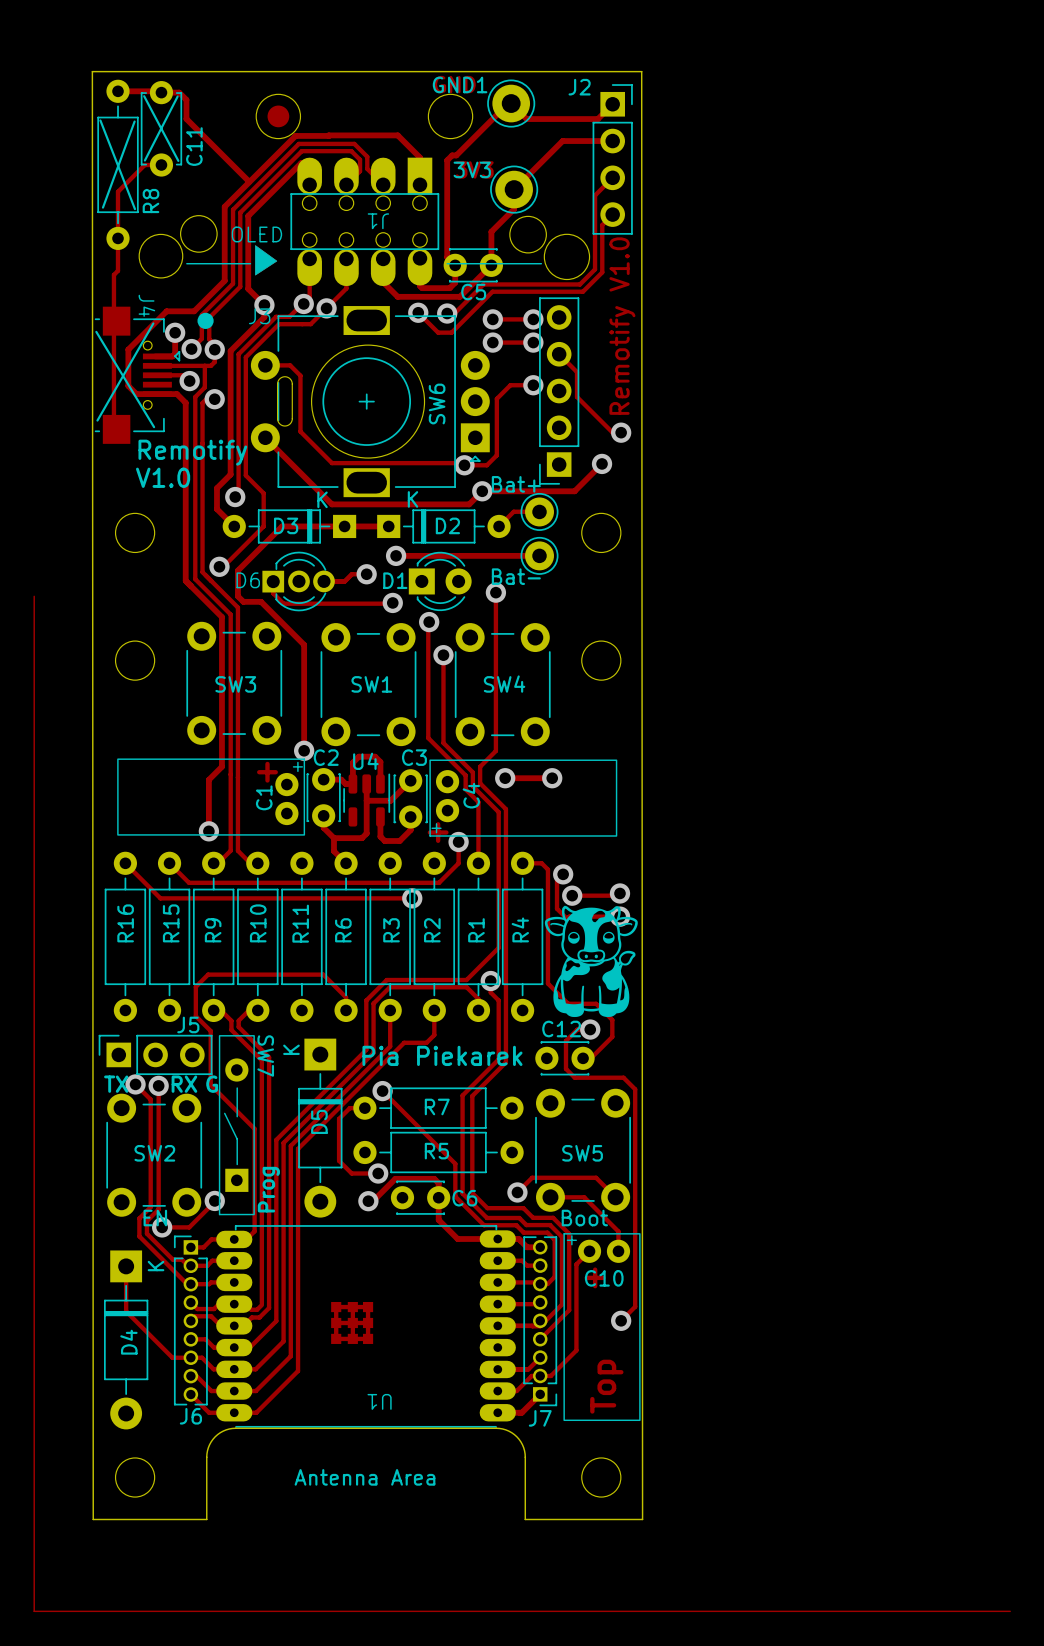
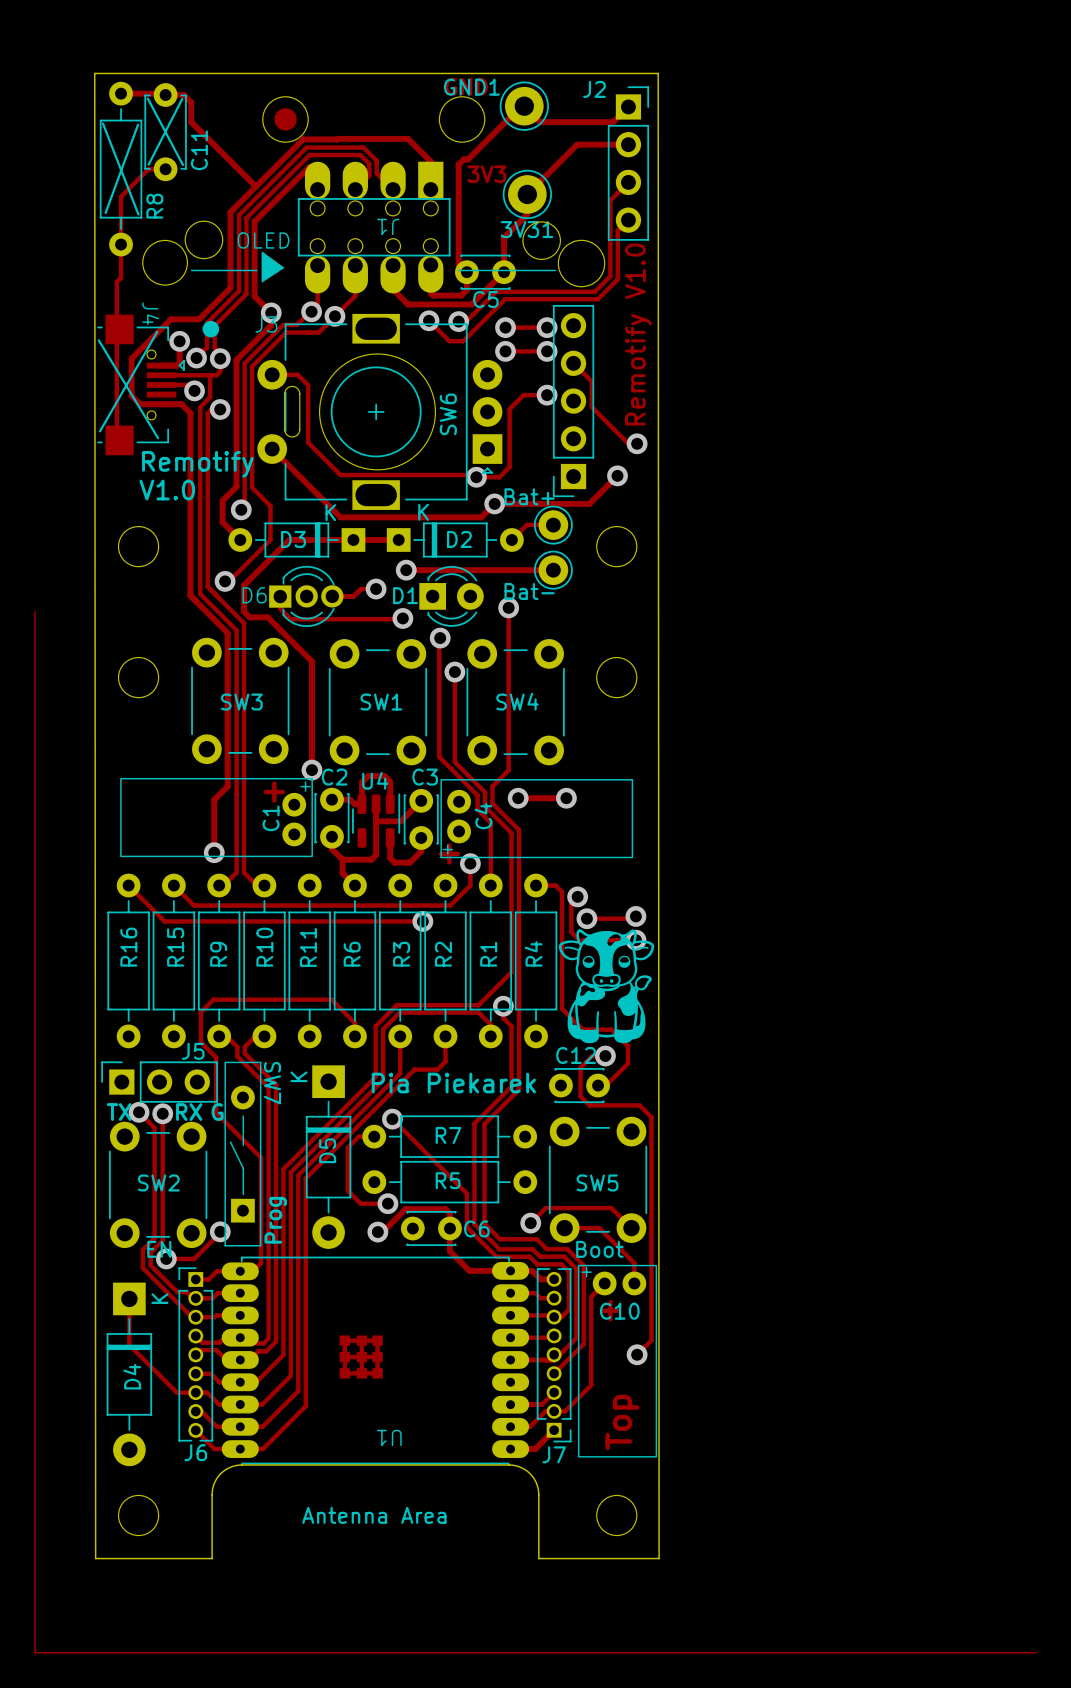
3V3 name: 3V3 (472, 169) -> 3V31 (527, 229)

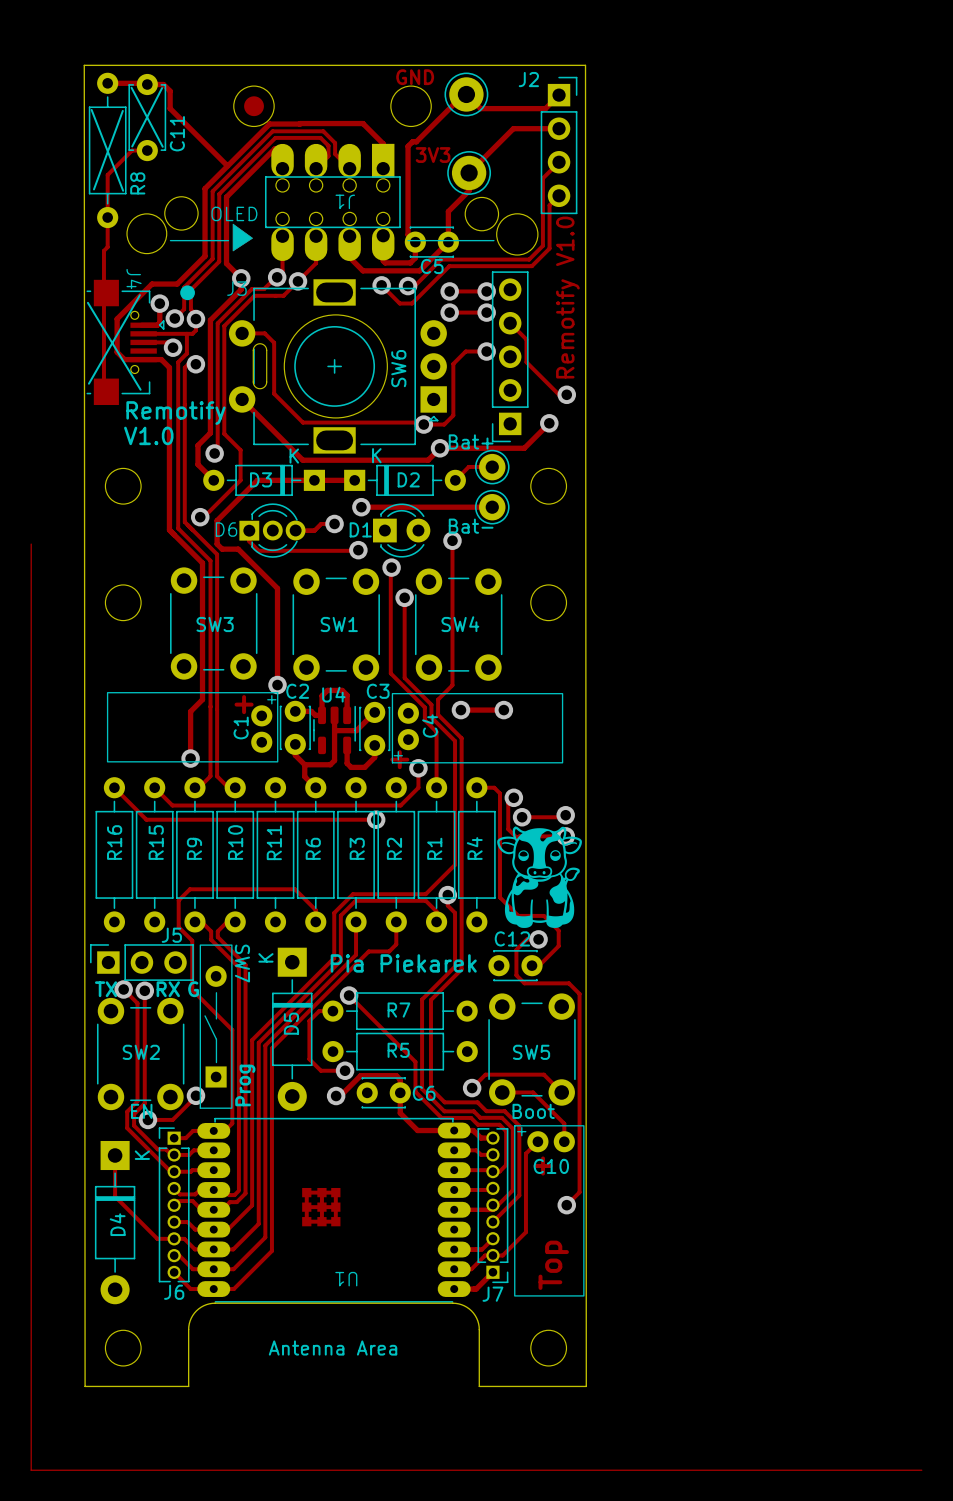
GND1 name: GND1 (471, 87) -> none
3V31 name: 3V31 (527, 229) -> none

